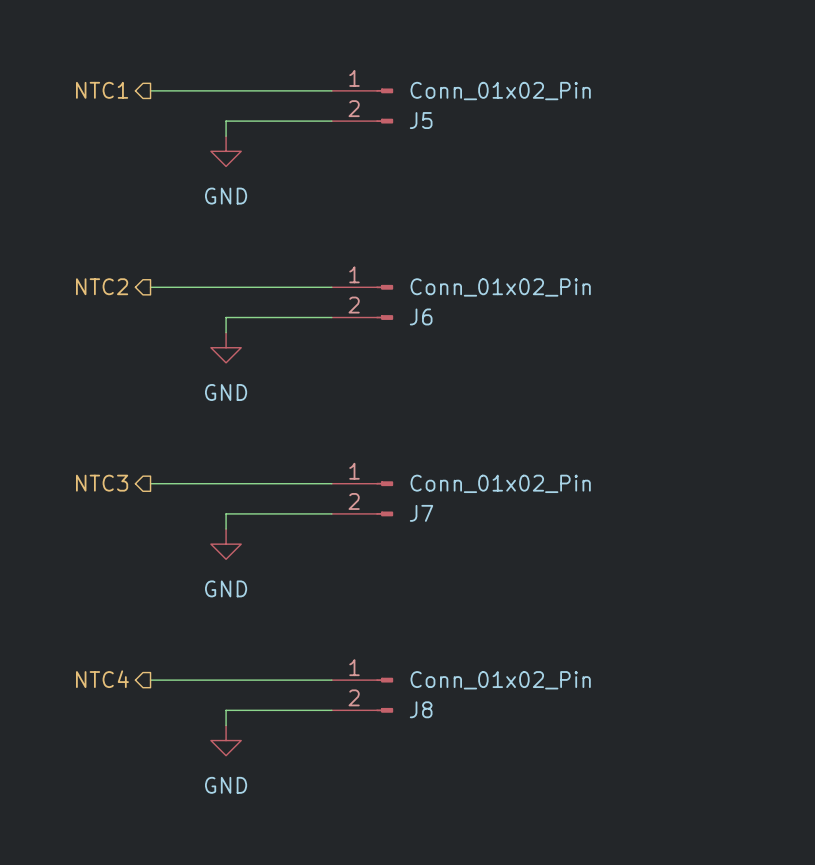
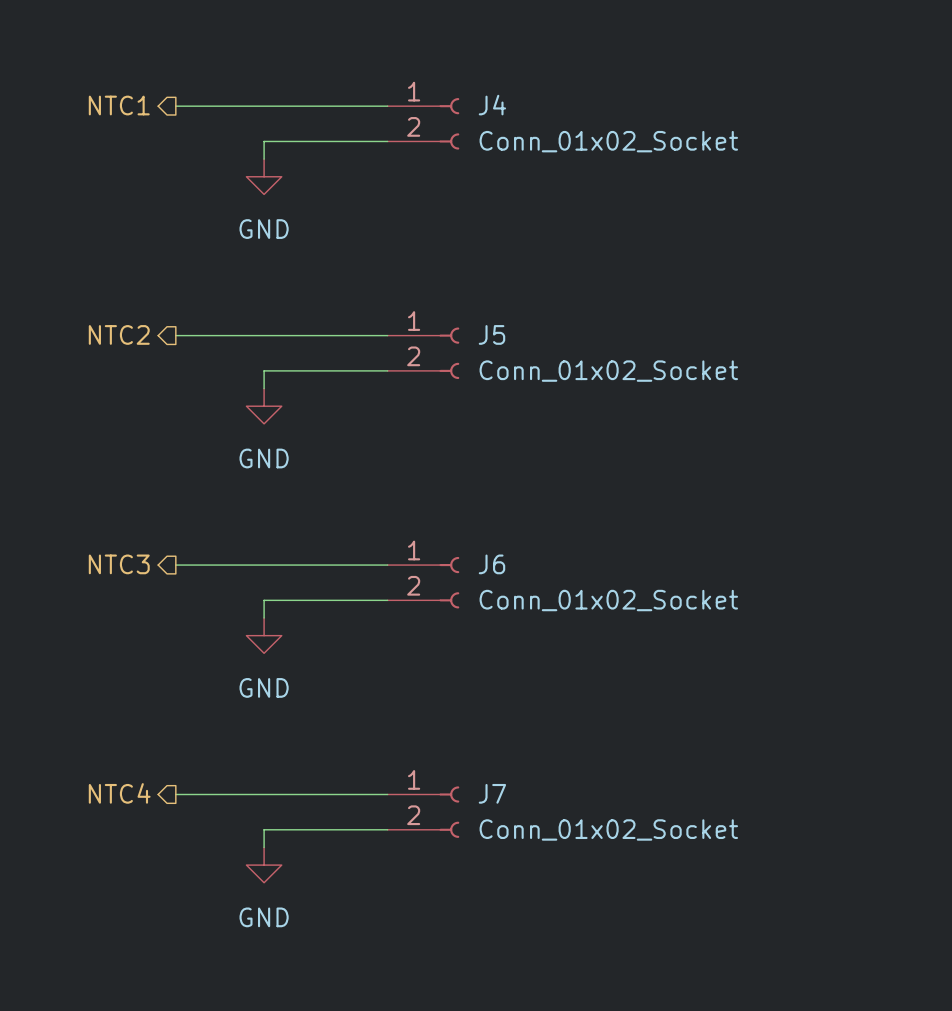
J5 symbol: [331, 88, 394, 124] -> [387, 327, 460, 380]
J5 value: Conn_01x02_Pin (500, 91) -> Conn_01x02_Socket (608, 371)
J4: none -> Conn_01x02_Socket (423, 123)
J5 name position: J5 (421, 120) -> J5 (491, 334)
J6 symbol: [331, 284, 394, 320] -> [387, 556, 460, 609]
J6 value: Conn_01x02_Pin (500, 287) -> Conn_01x02_Socket (608, 600)
J6 name position: J6 (421, 316) -> J6 (491, 564)
J7 symbol: [331, 481, 394, 517] -> [387, 786, 460, 838]
J7 value: Conn_01x02_Pin (500, 483) -> Conn_01x02_Socket (608, 829)
J7 name position: J7 (421, 513) -> J7 (492, 793)
J8: Conn_01x02_Pin (362, 695) -> none

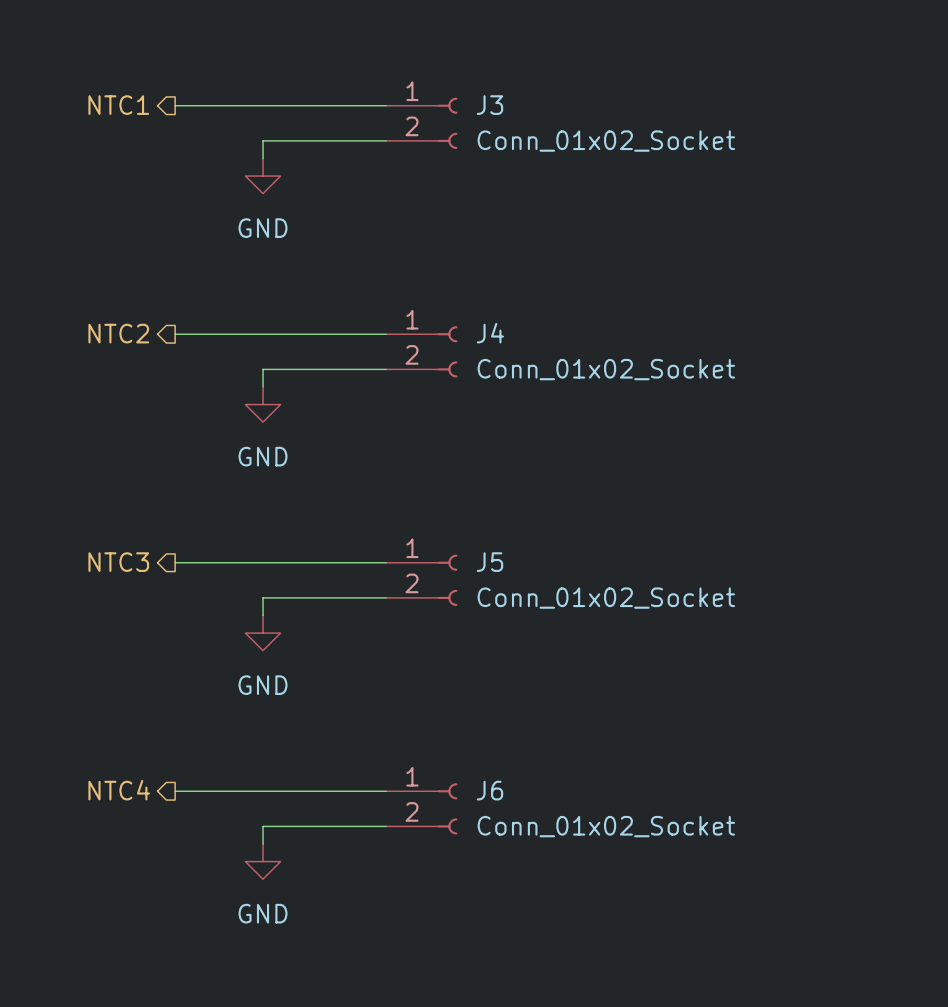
J4 name: J4 (492, 105) -> J3 (489, 105)
J5 name: J5 (491, 334) -> J4 (490, 333)
J6 name: J6 (491, 564) -> J5 (489, 562)
J7 name: J7 (492, 793) -> J6 (489, 790)

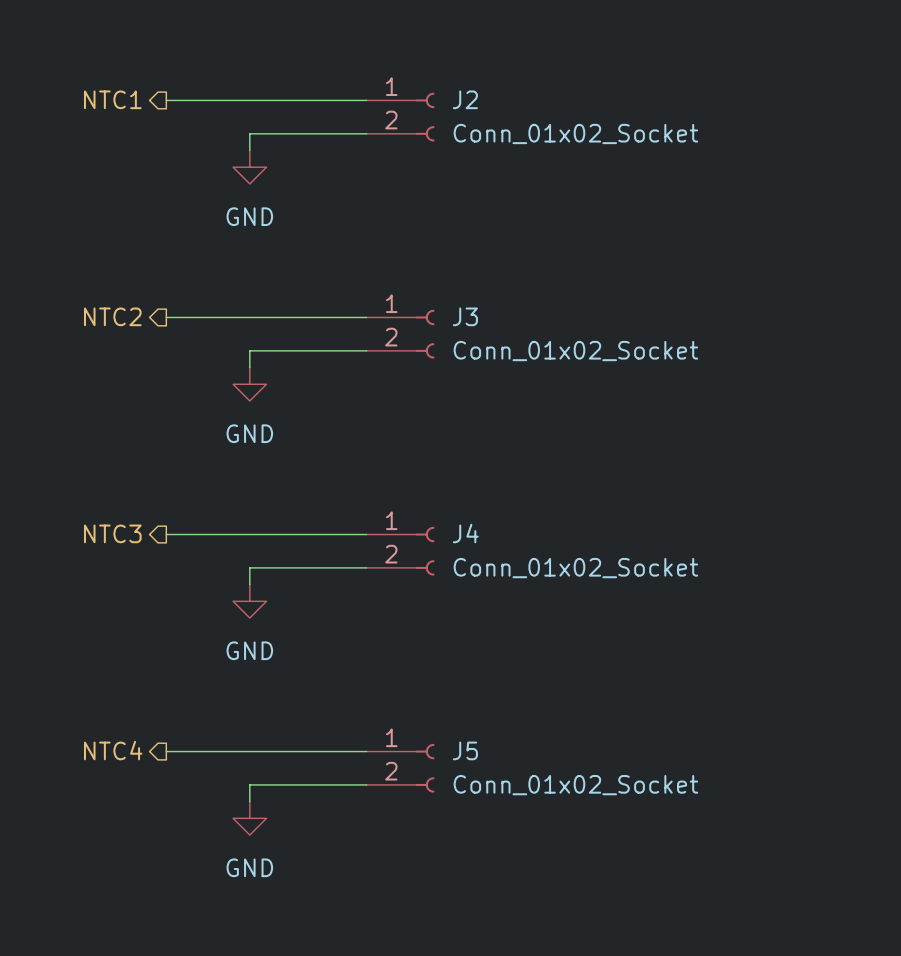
J3 name: J3 (489, 105) -> J2 (465, 99)
J4 name: J4 (490, 333) -> J3 (465, 316)
J5 name: J5 (489, 562) -> J4 (465, 533)
J6 name: J6 (489, 790) -> J5 (465, 750)

